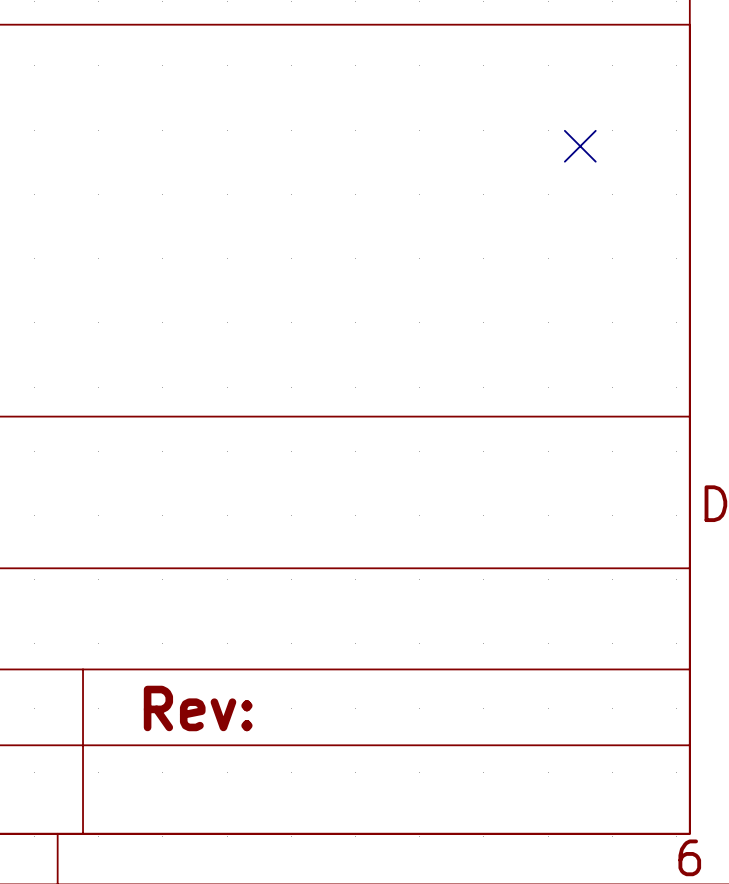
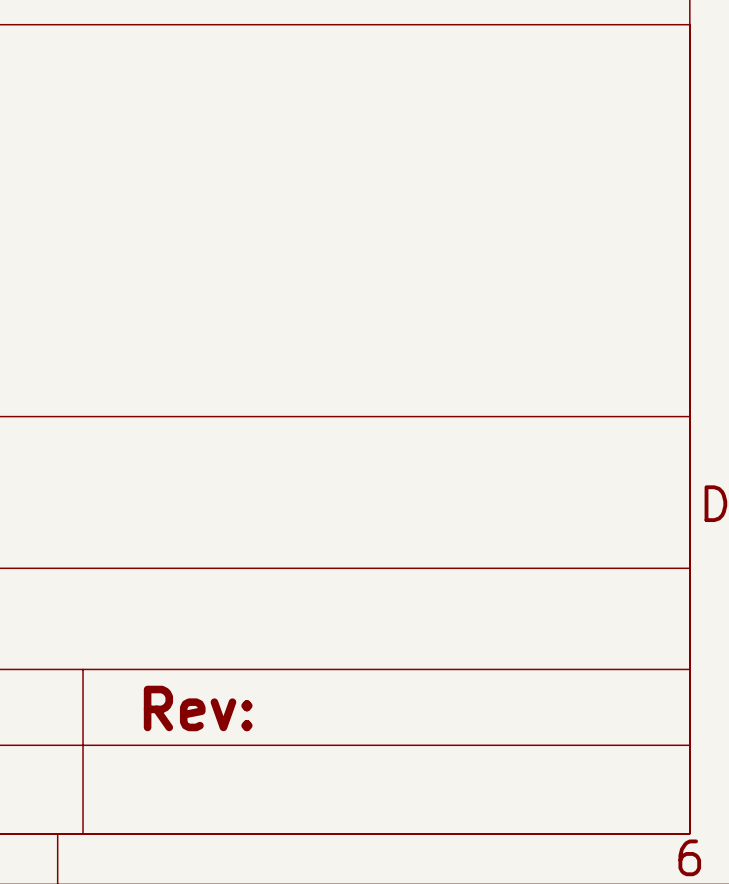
no-connect mark: (580, 146) -> none

